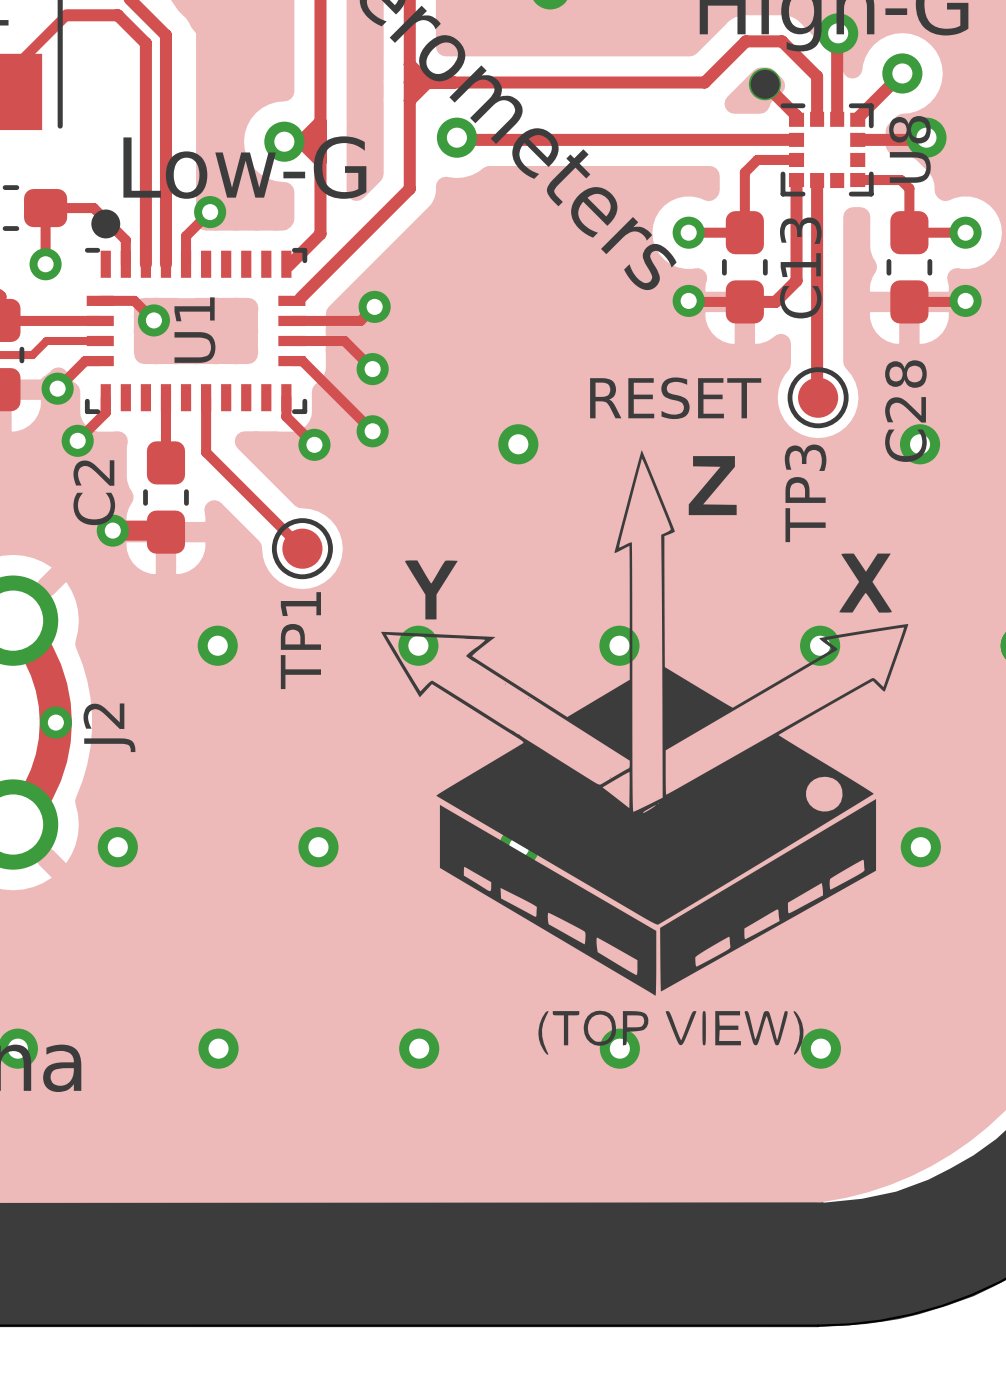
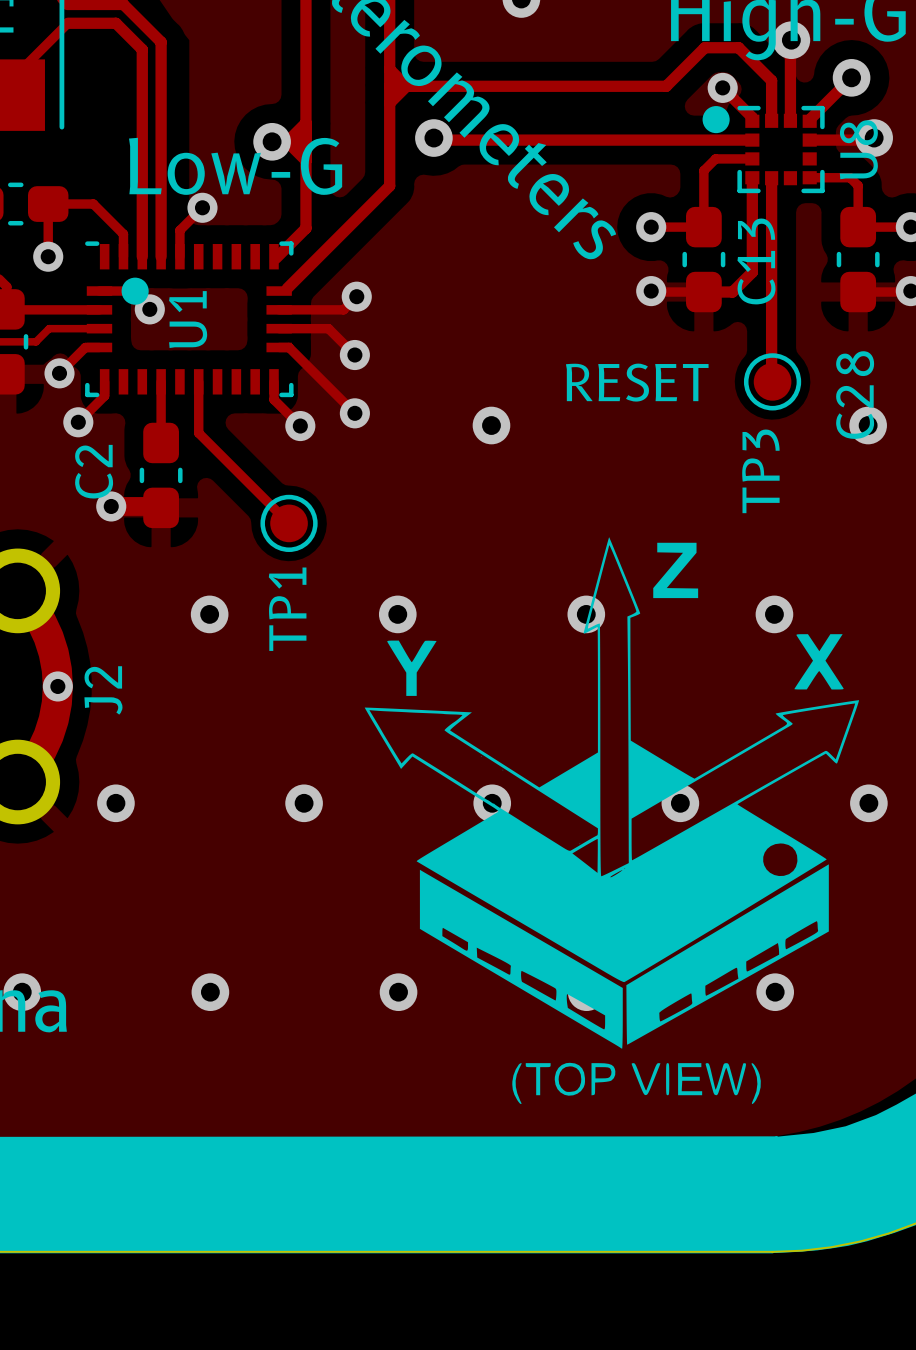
drawing position: (765, 84) -> (716, 119)
drawing position: (105, 223) -> (135, 291)
drawing position: (644, 752) -> (611, 820)

